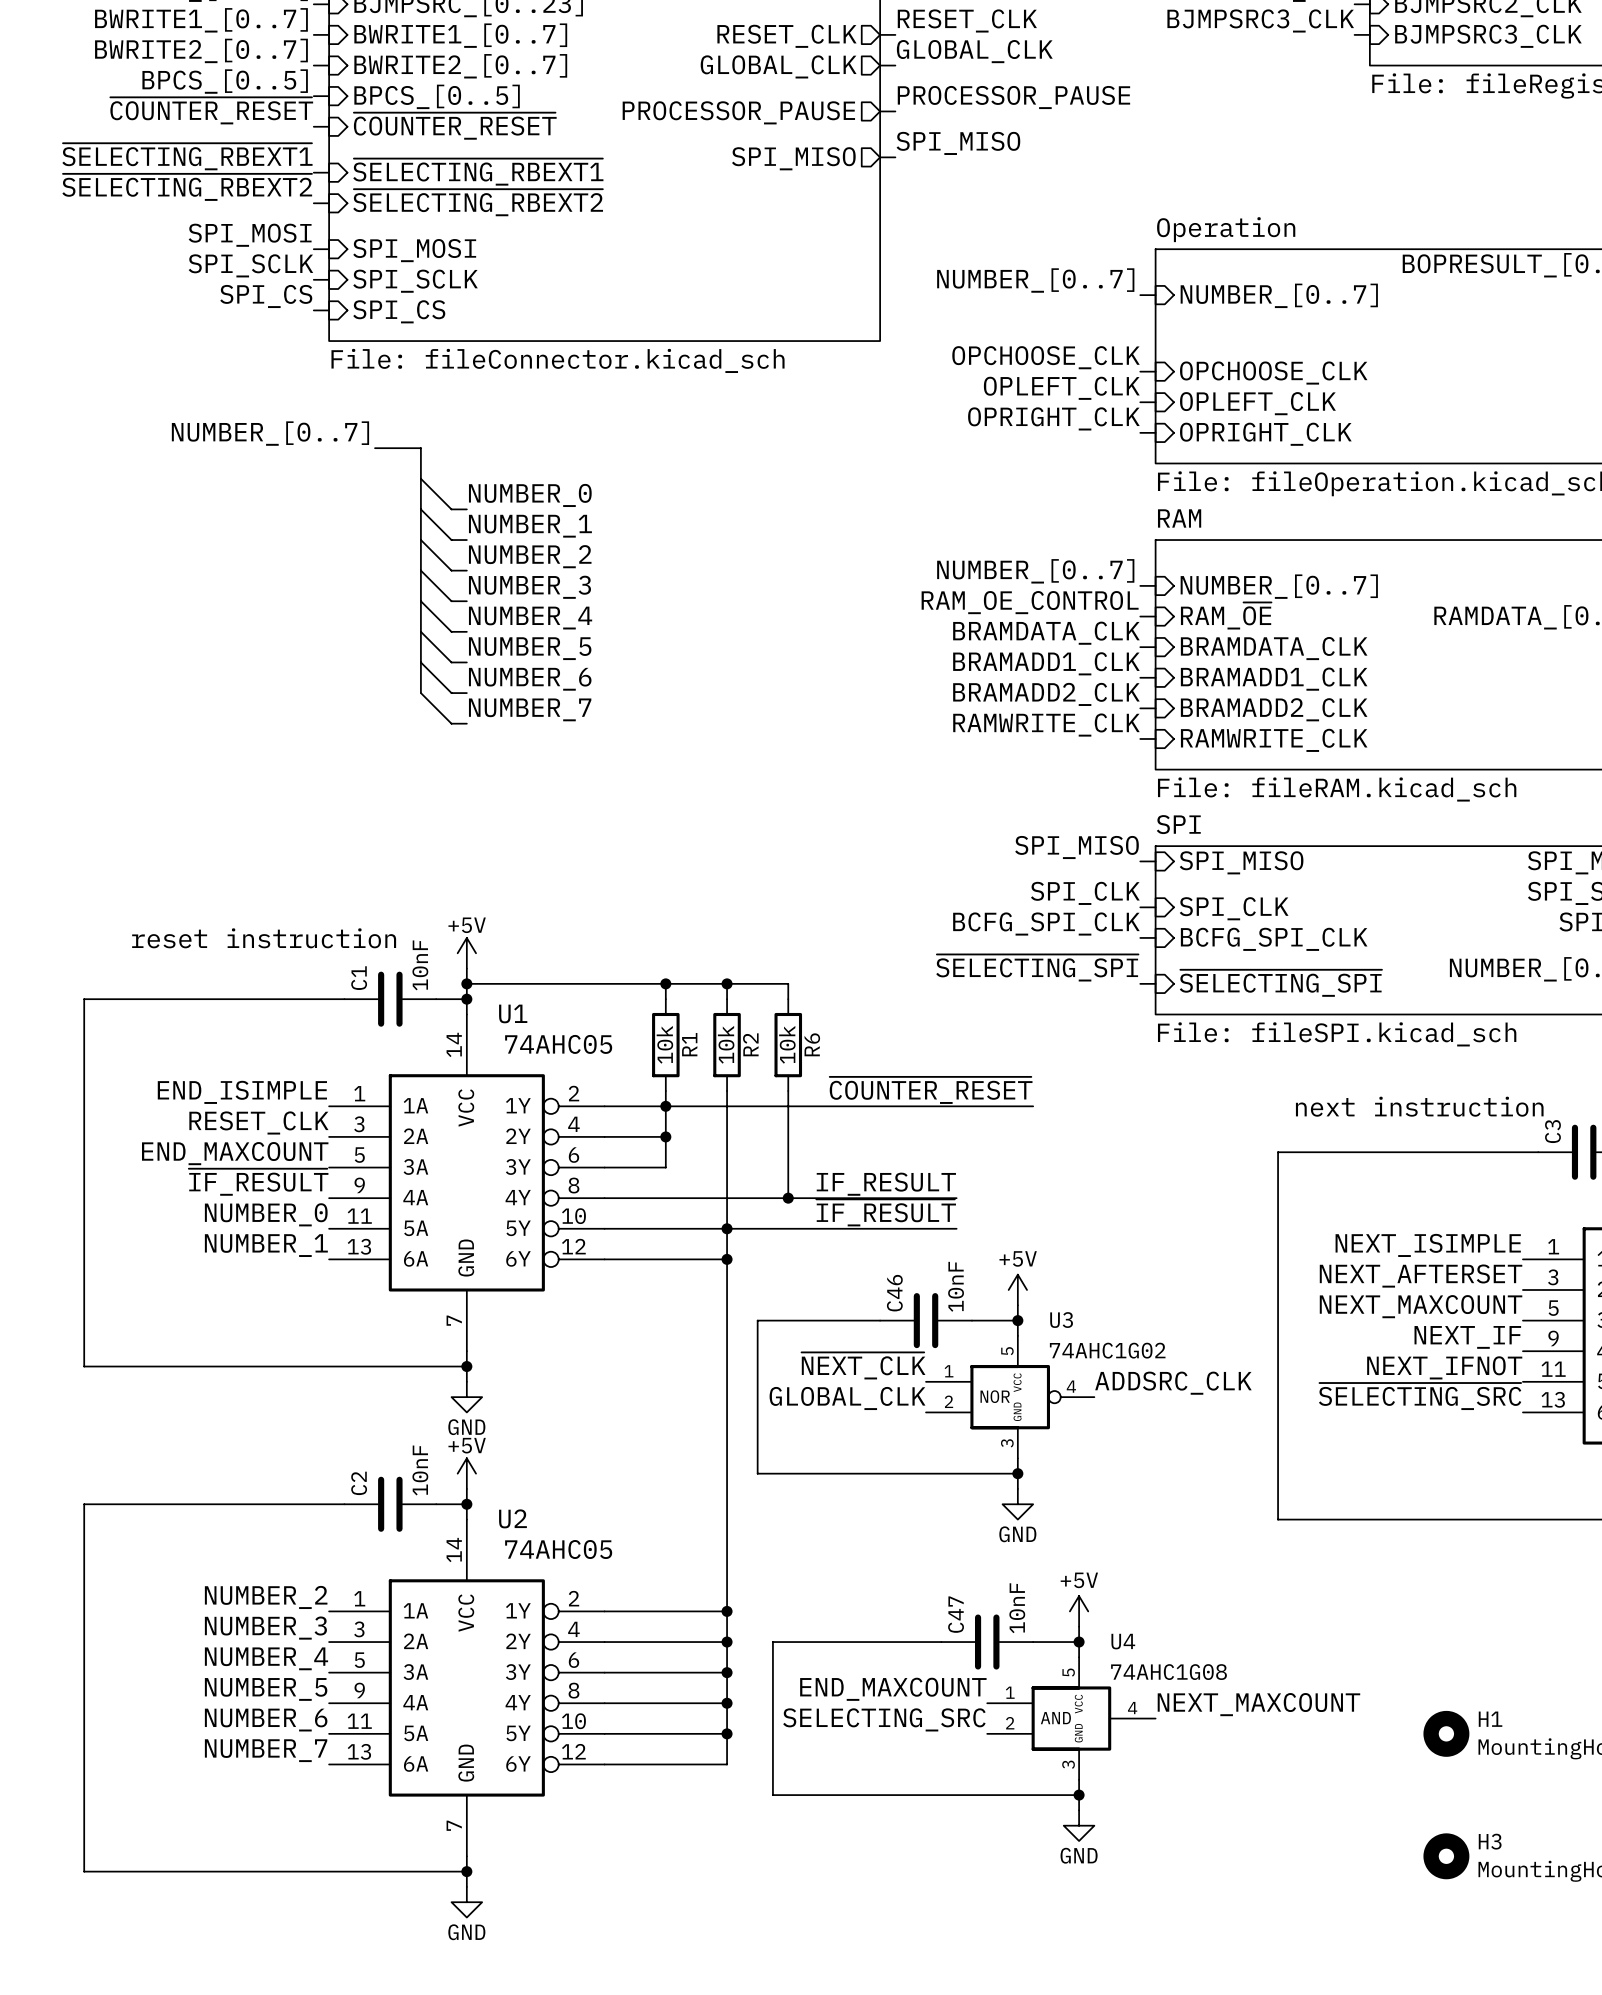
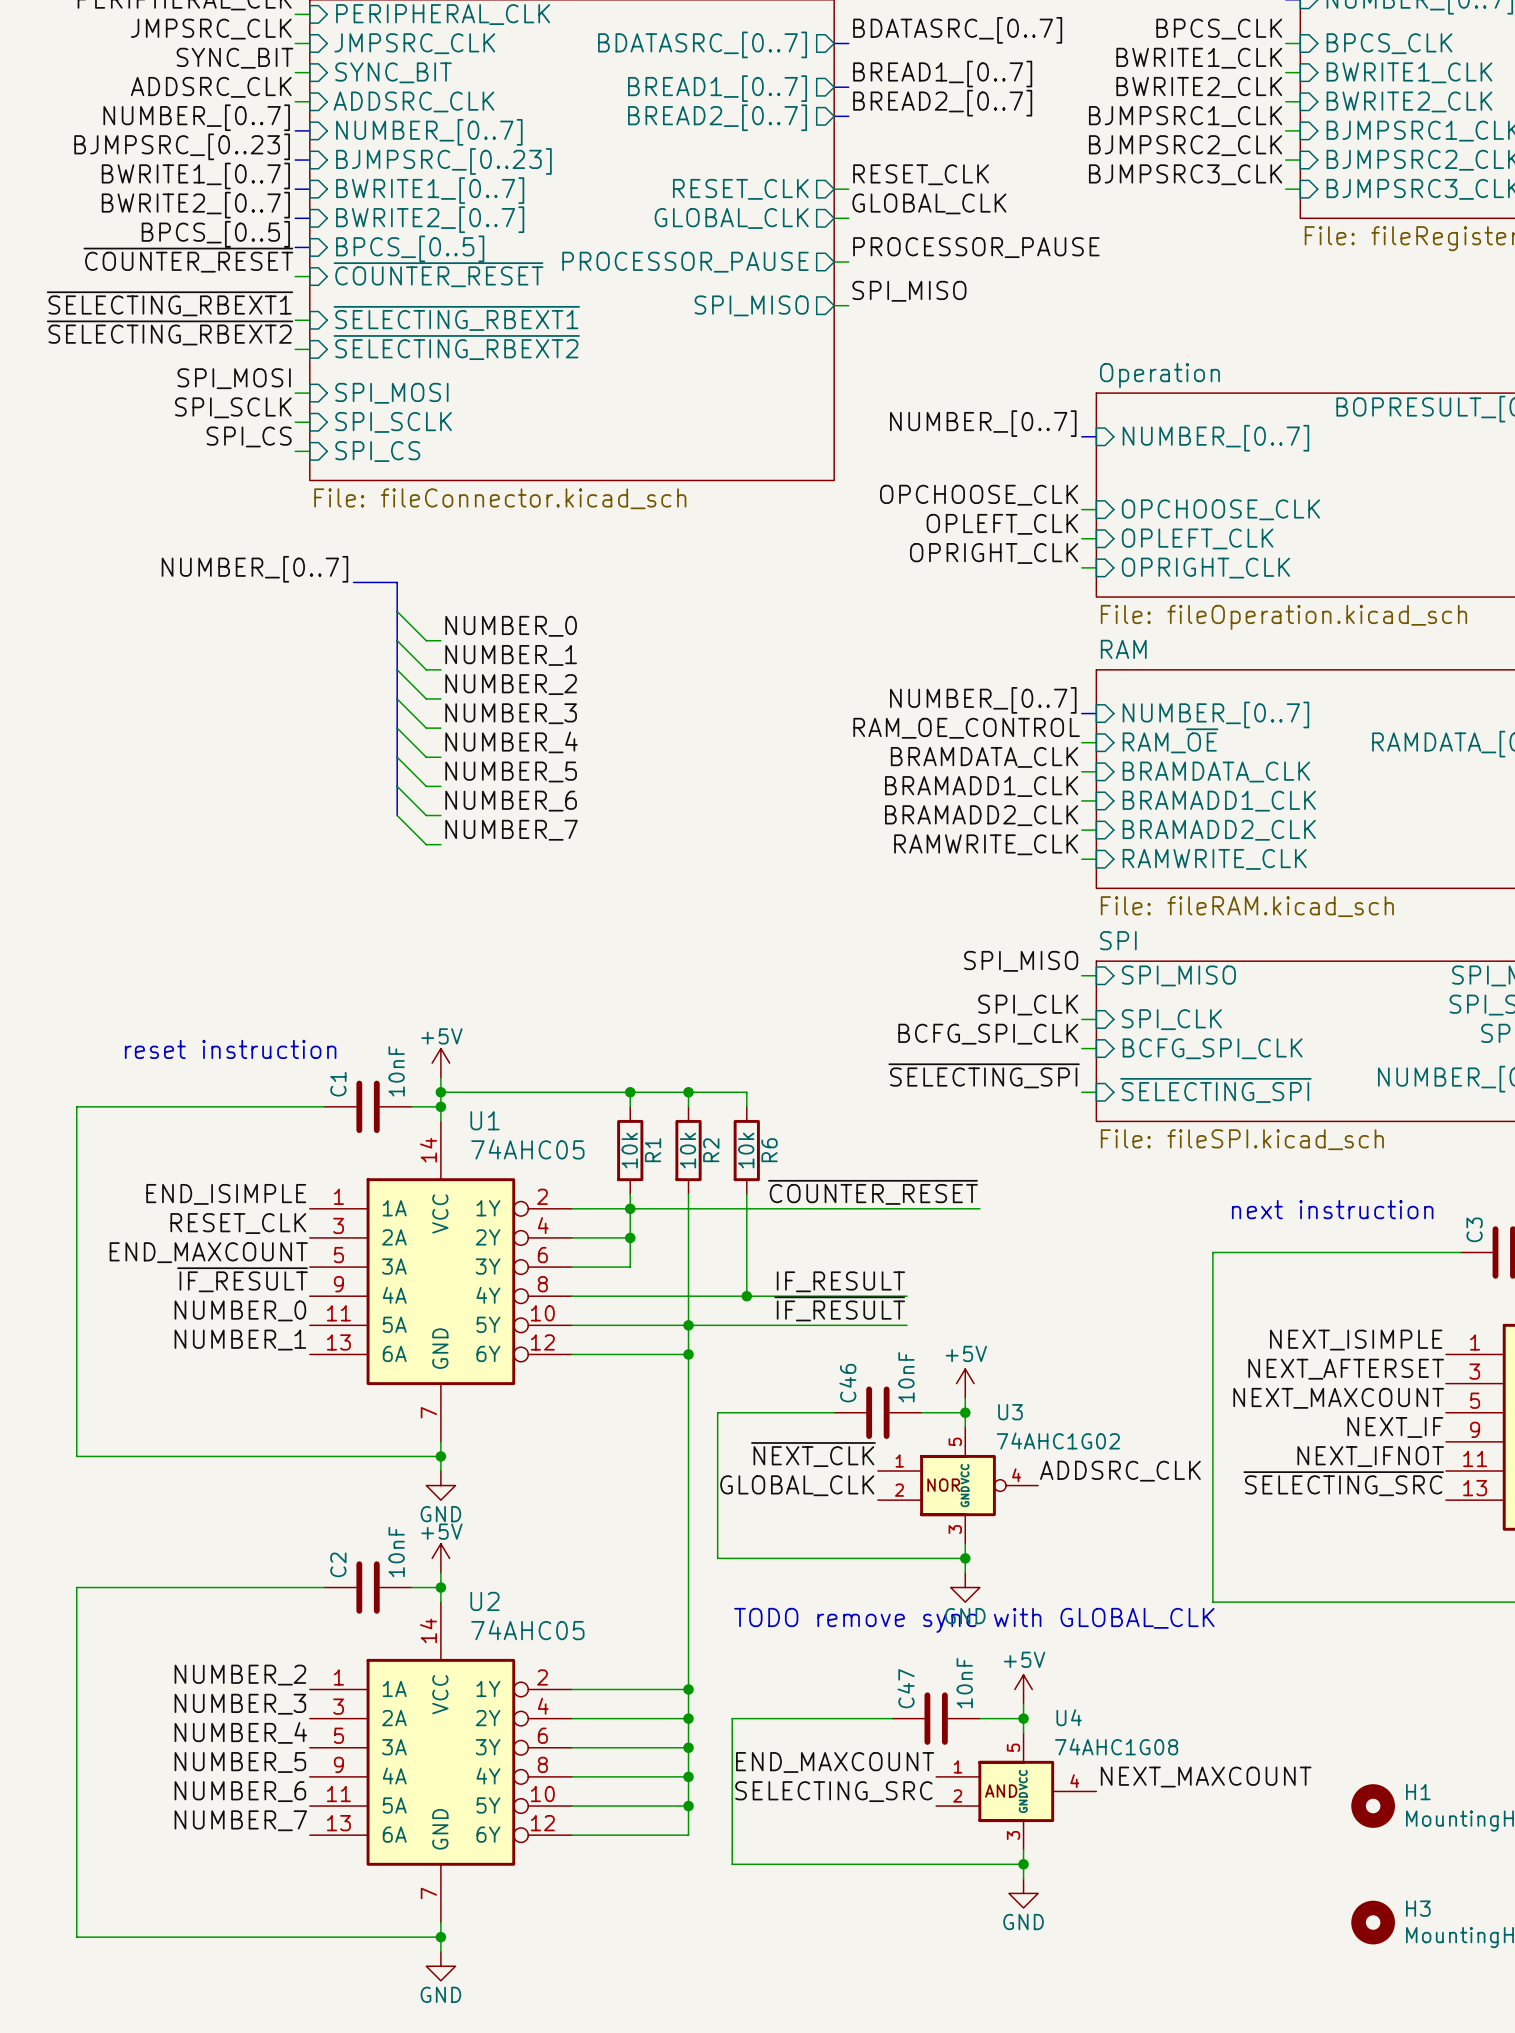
text: none -> TODO remove sync with GLOBAL_CLK (974, 1620)

